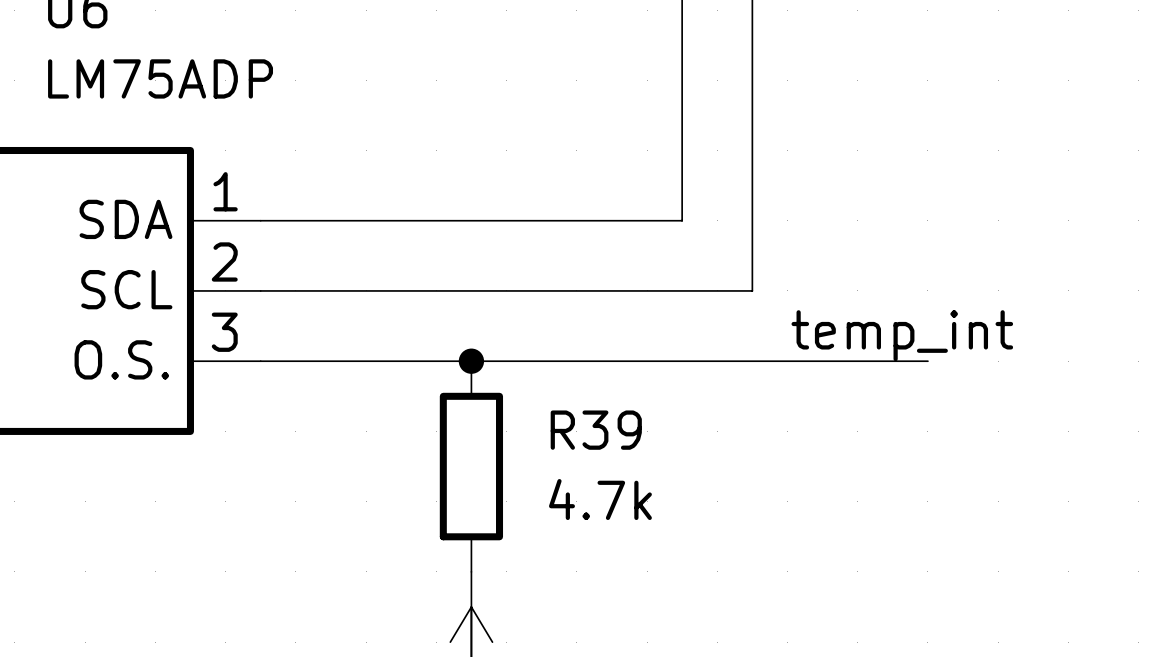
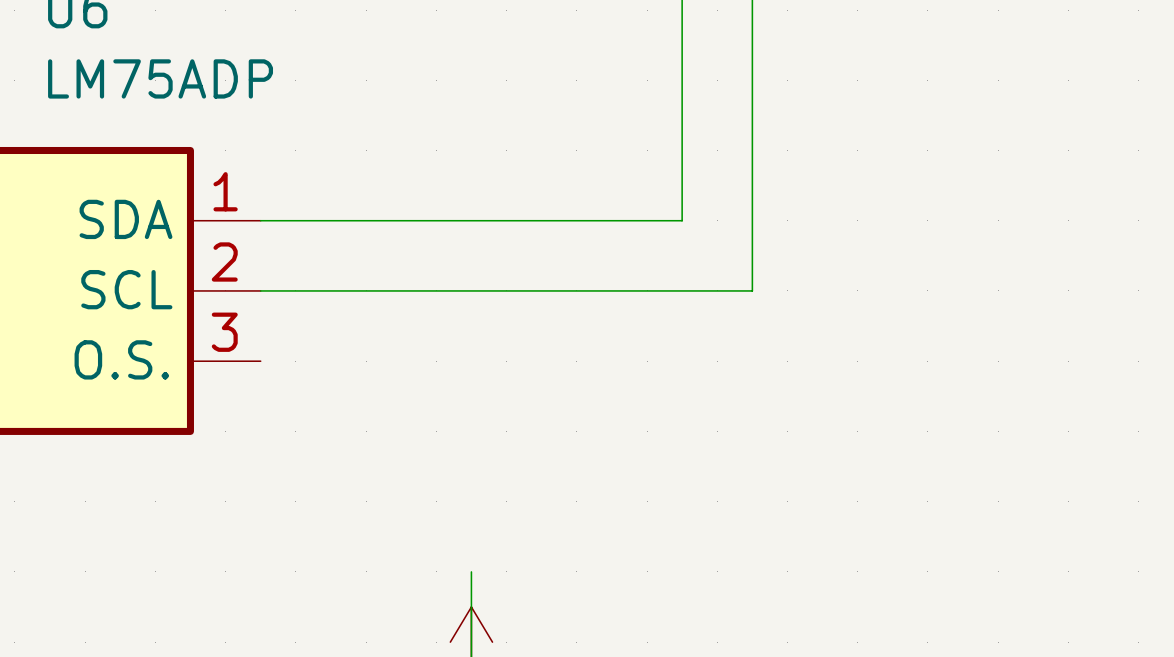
label: temp_int (902, 335) -> none
wire: (260, 361) (927, 361) -> none
junction: (471, 361) -> none
R39: 4.7k (471, 466) -> none

